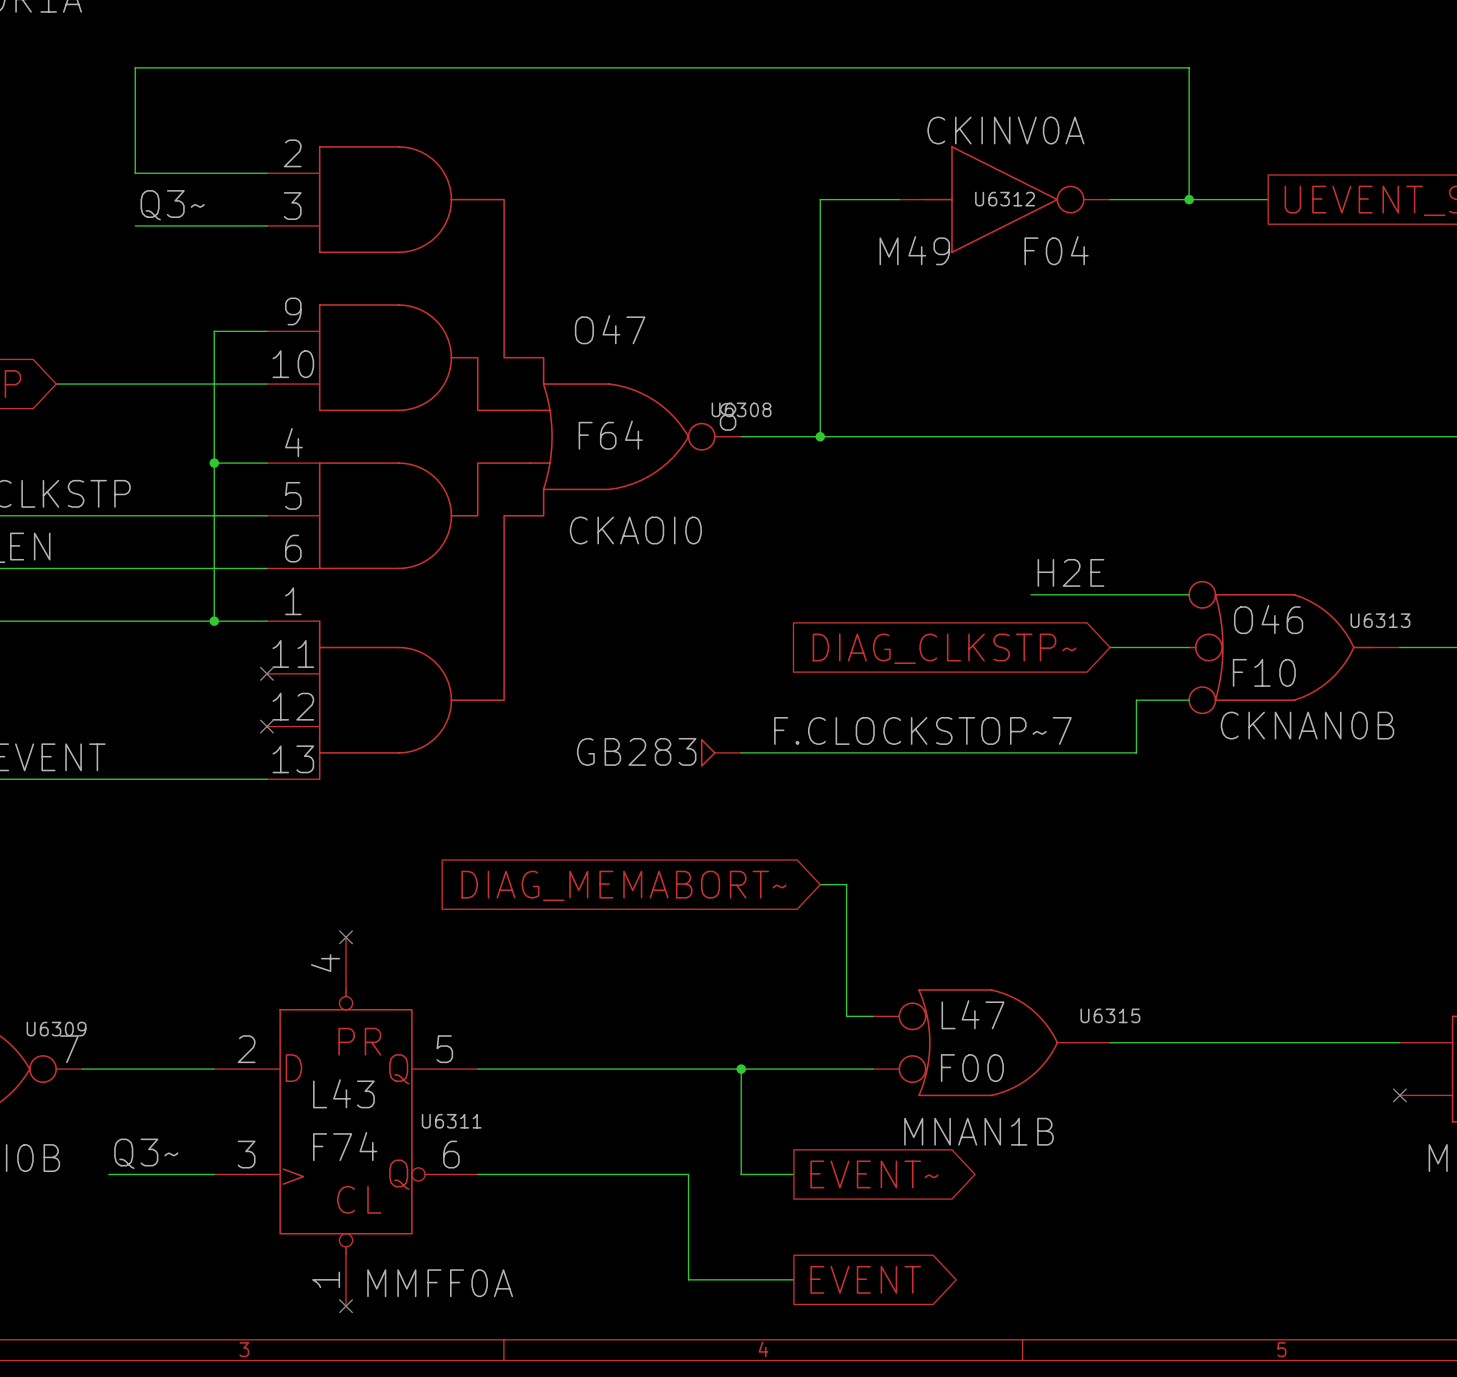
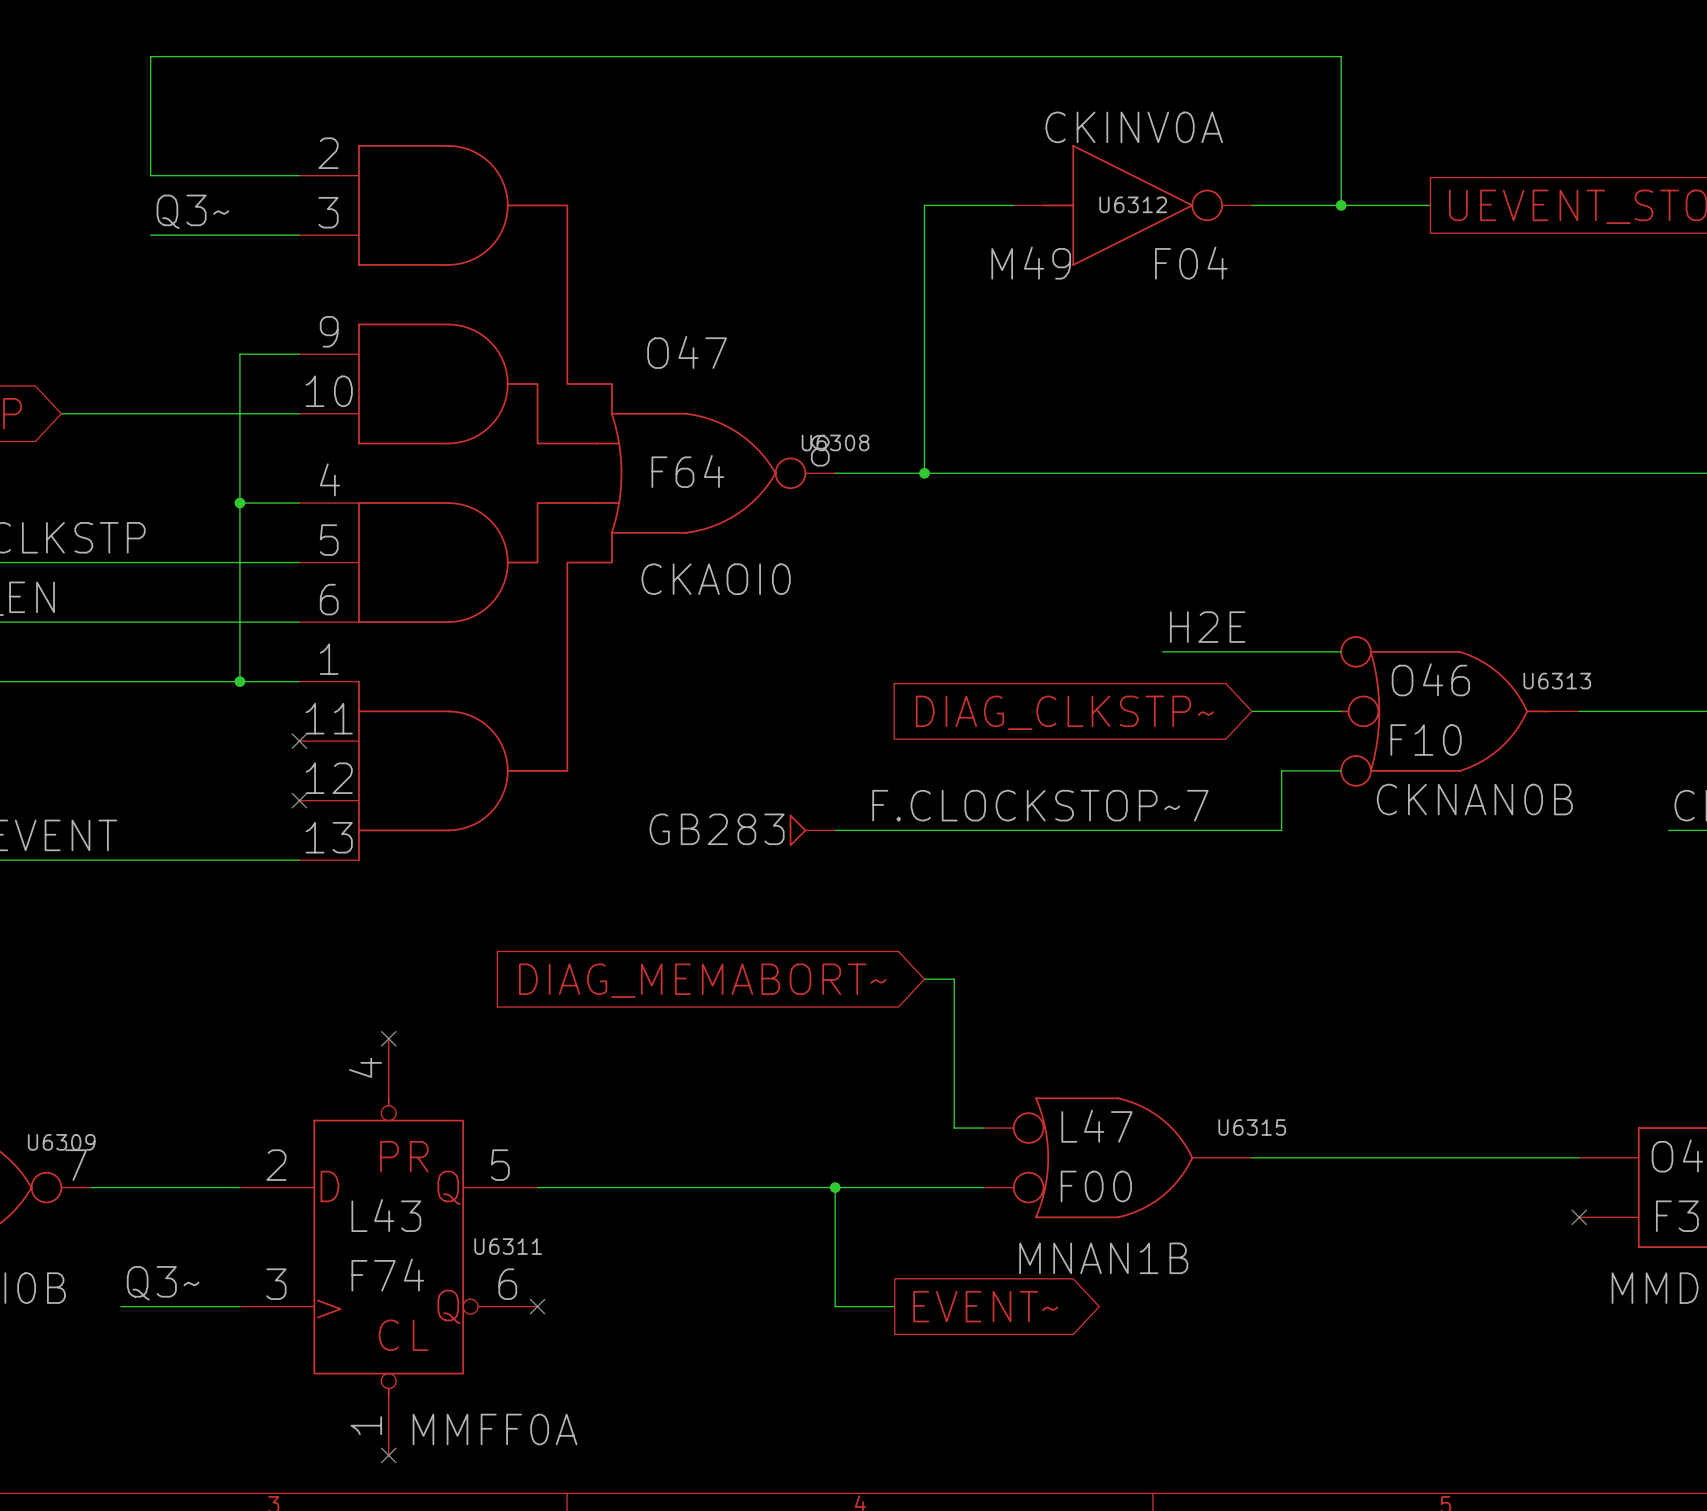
wire: (477, 1174) (688, 1174) (688, 1279) (793, 1279) -> none
no-connect mark: none -> (537, 1306)
global label: EVENT (865, 1279) -> none

